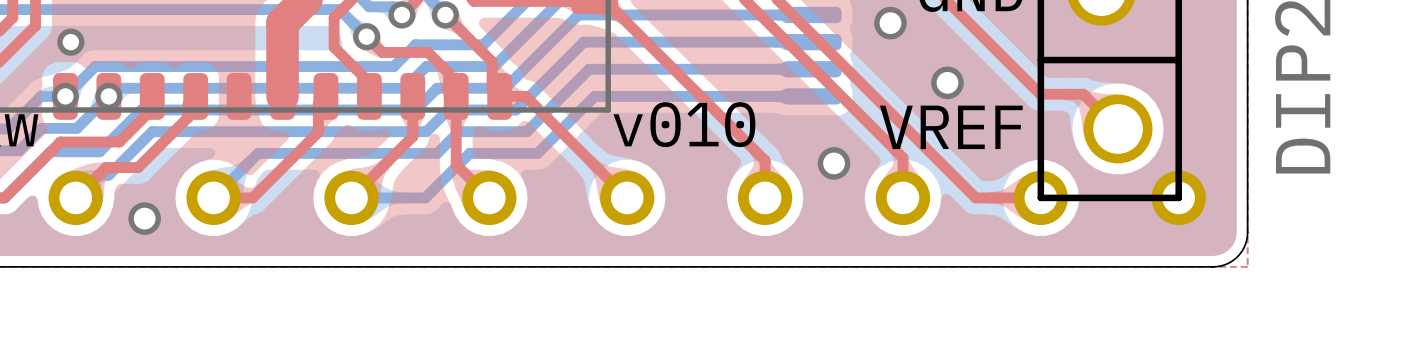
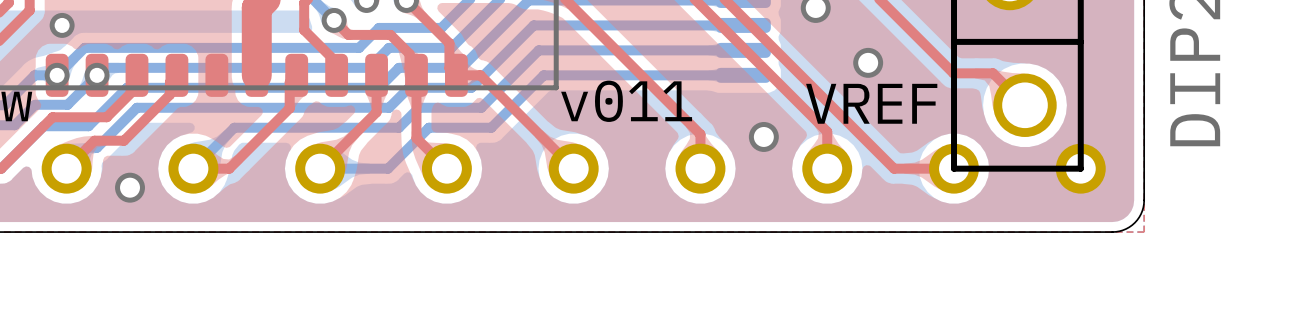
text: v010 (684, 124) -> v011 (626, 101)

